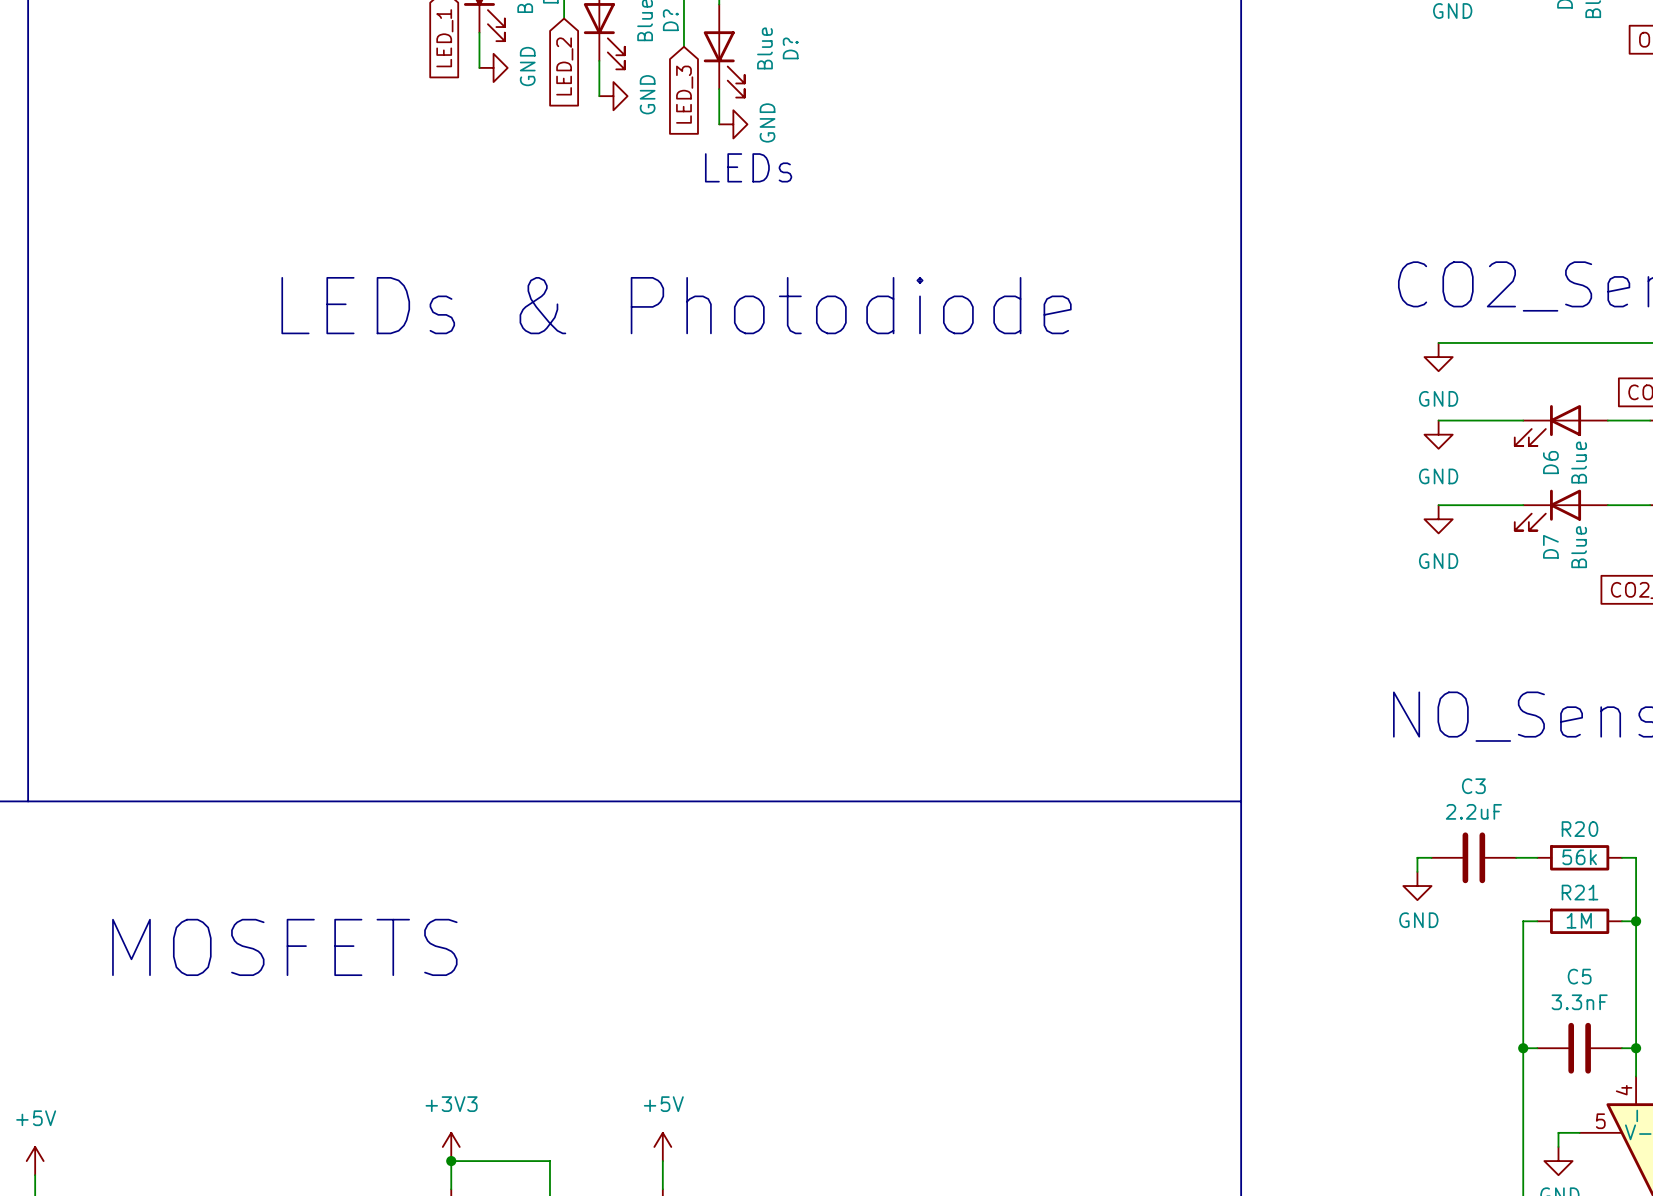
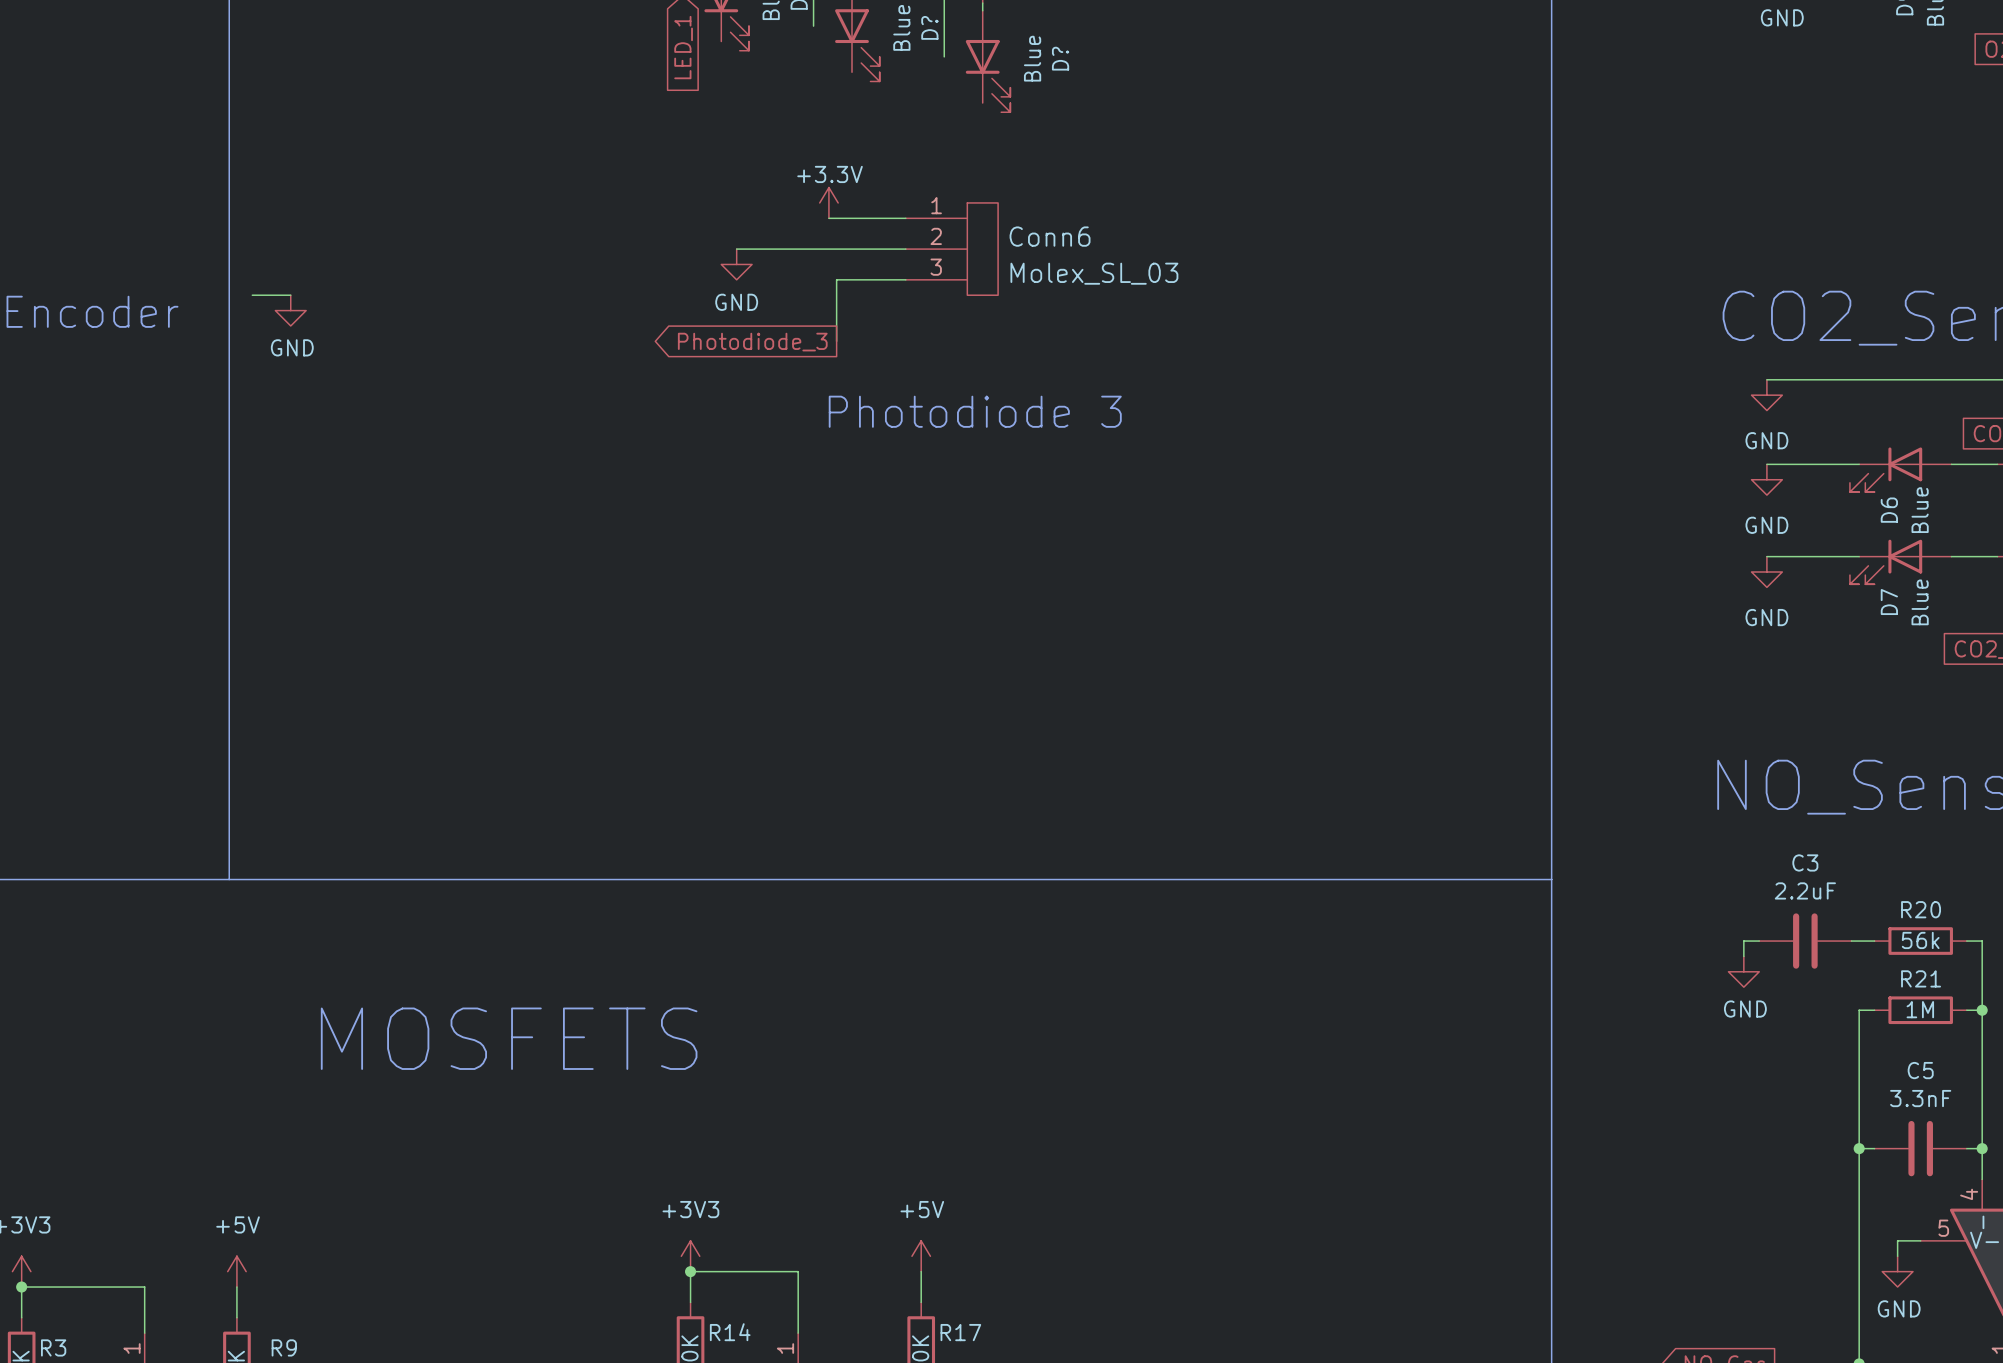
wire: (479, 32) (479, 67) -> none
wire: (599, 60) (599, 96) -> none
global label: LED_2 (564, 66) -> none
power symbol: GND (493, 67) -> none
wire: (719, 89) (719, 124) -> none
global label: LED_3 (684, 94) -> none
power symbol: GND (613, 96) -> none
power symbol: GND (733, 124) -> none
text: LEDs (748, 167) -> none
power symbol: none -> +3.3V (828, 202)
wire: none -> (828, 218) (905, 218)
wire: none -> (736, 249) (905, 249)
Conn6: none -> Molex_SL_03 (951, 249)
power symbol: none -> GND (736, 264)
wire: none -> (905, 279) (836, 279) (836, 341)
wire: none -> (252, 295) (290, 295)
power symbol: none -> GND (290, 310)
text: LEDs & Photodiode (676, 305) -> none
global label: none -> Photodiode_3 (752, 342)
text: none -> Photodiode 3 (975, 411)

